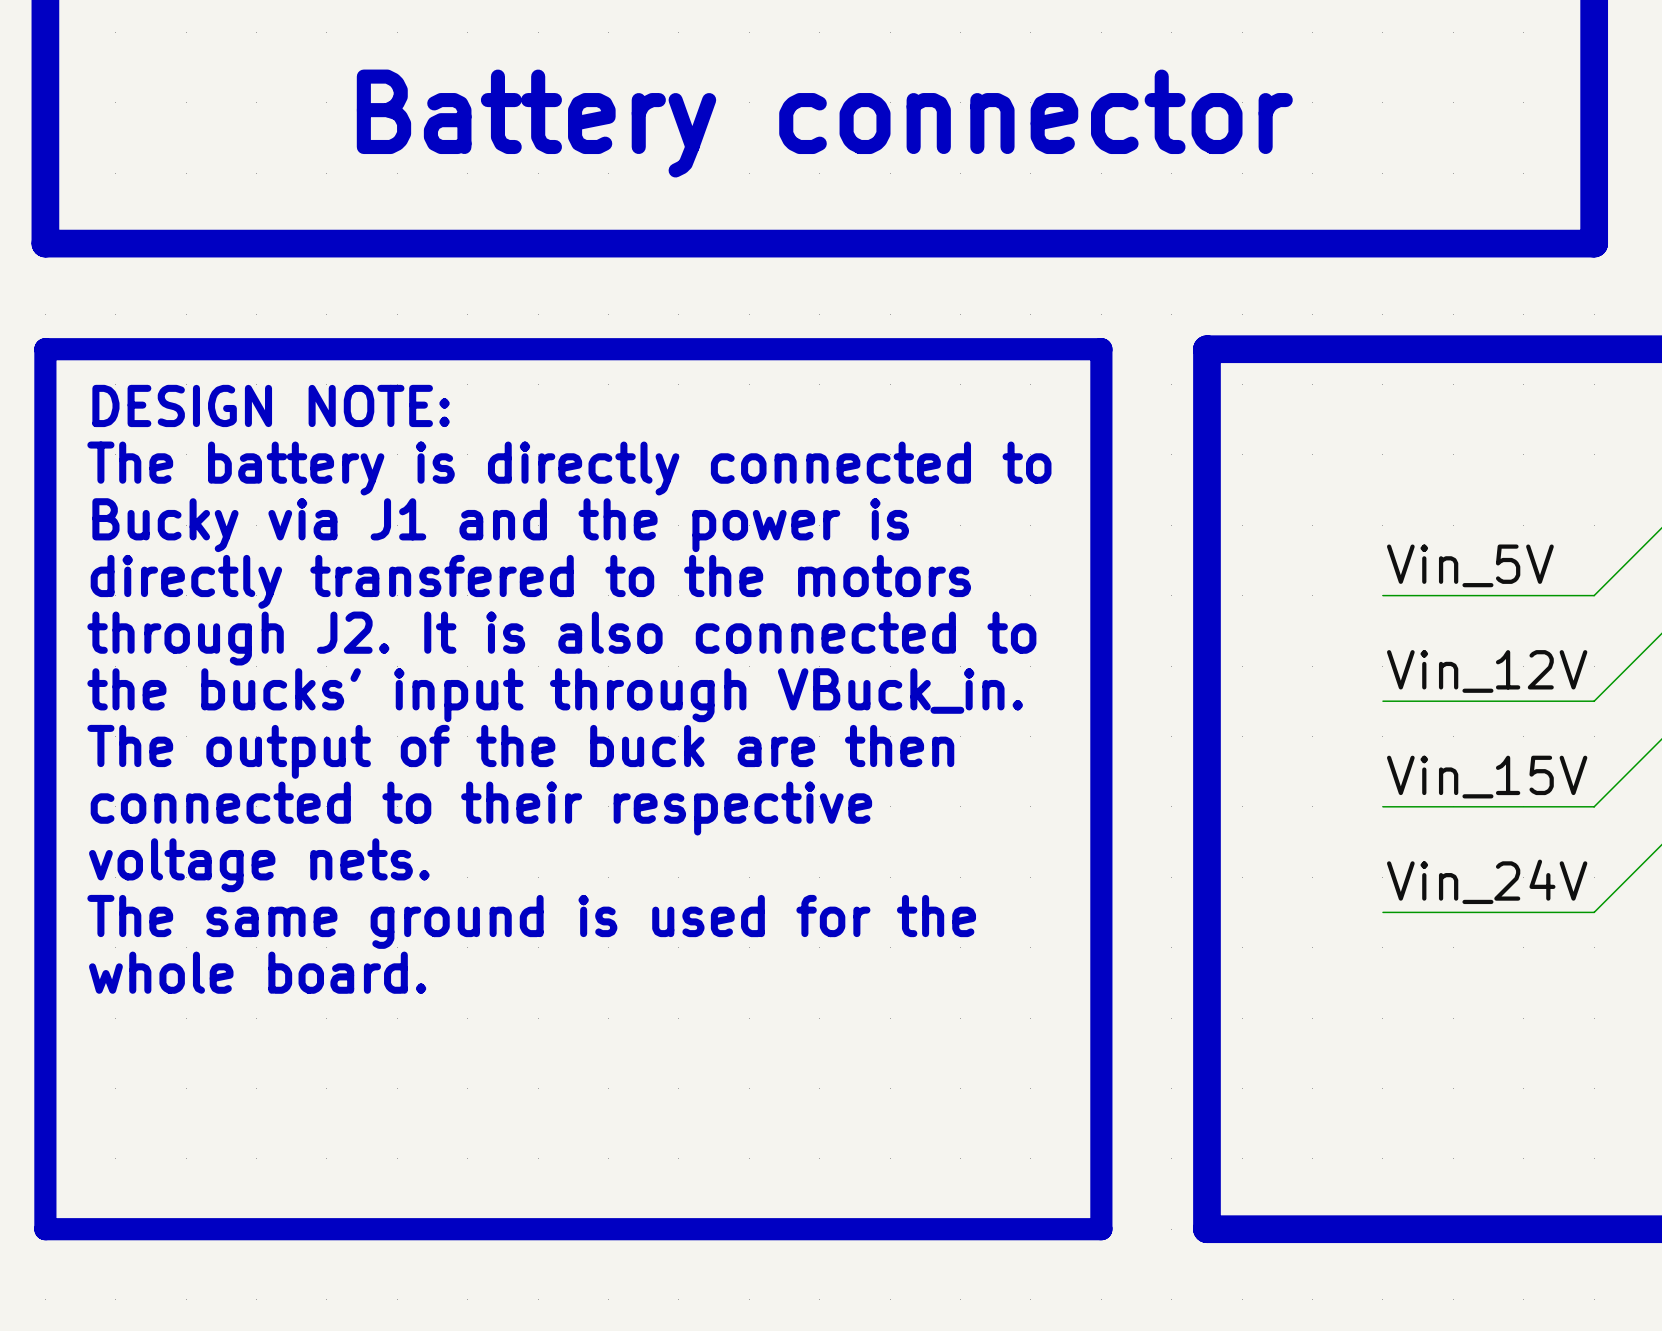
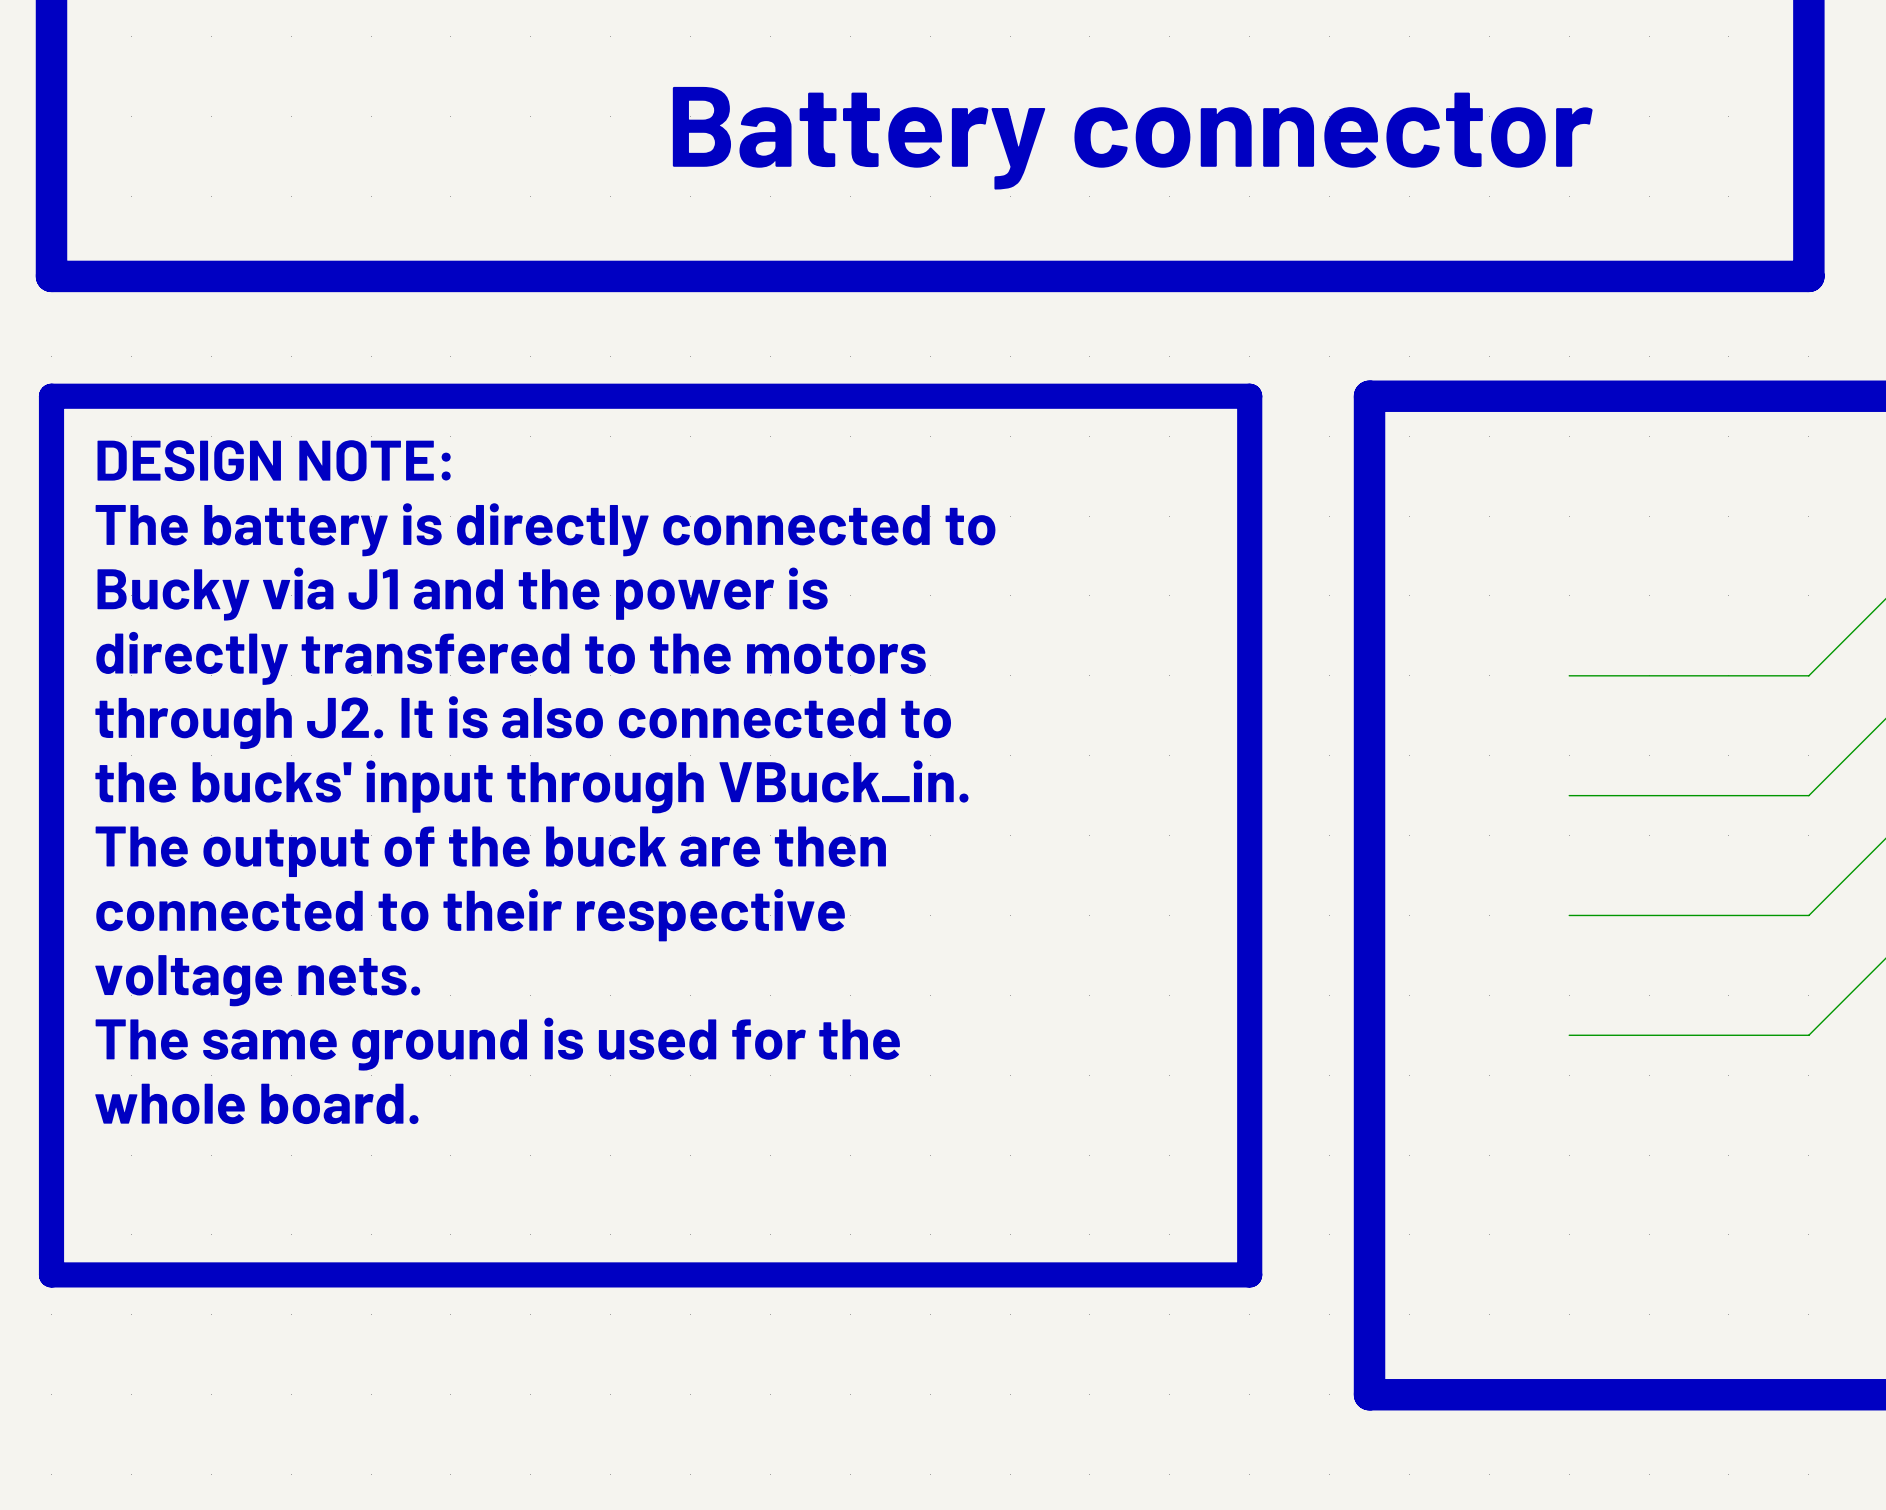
text position: Battery connector (824, 123) -> Battery connector (1132, 138)
label: Vin_5V (1470, 565) -> none
label: Vin_12V (1487, 671) -> none
label: Vin_15V (1487, 777) -> none
label: Vin_24V (1487, 881) -> none
line: (45, 1123) (45, 1229) (1101, 1229) (1101, 1123) -> (51, 1274) (1249, 1274)

